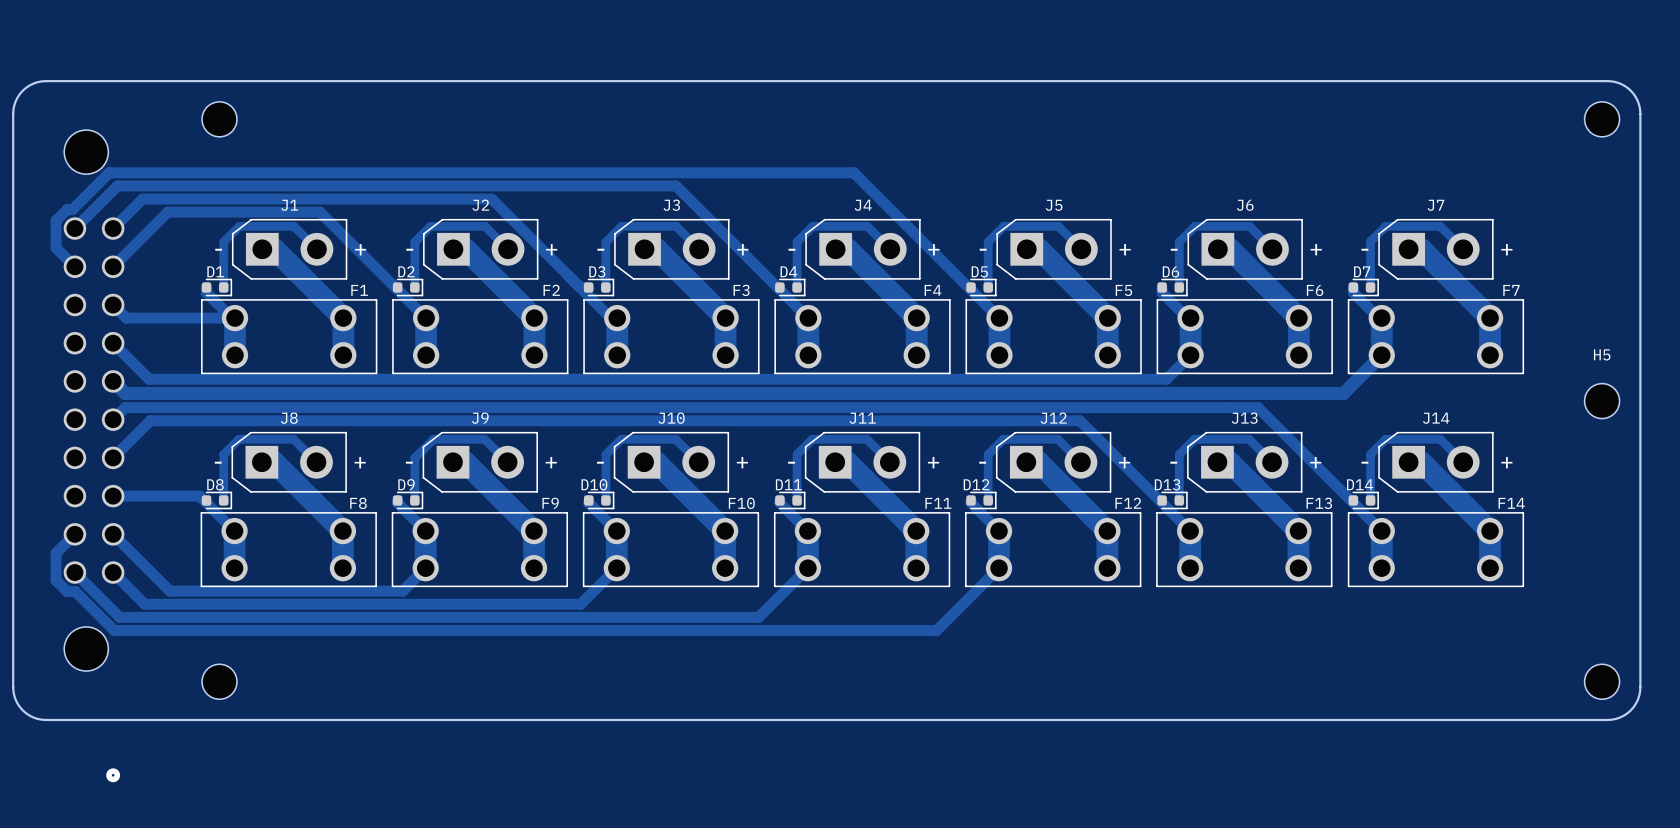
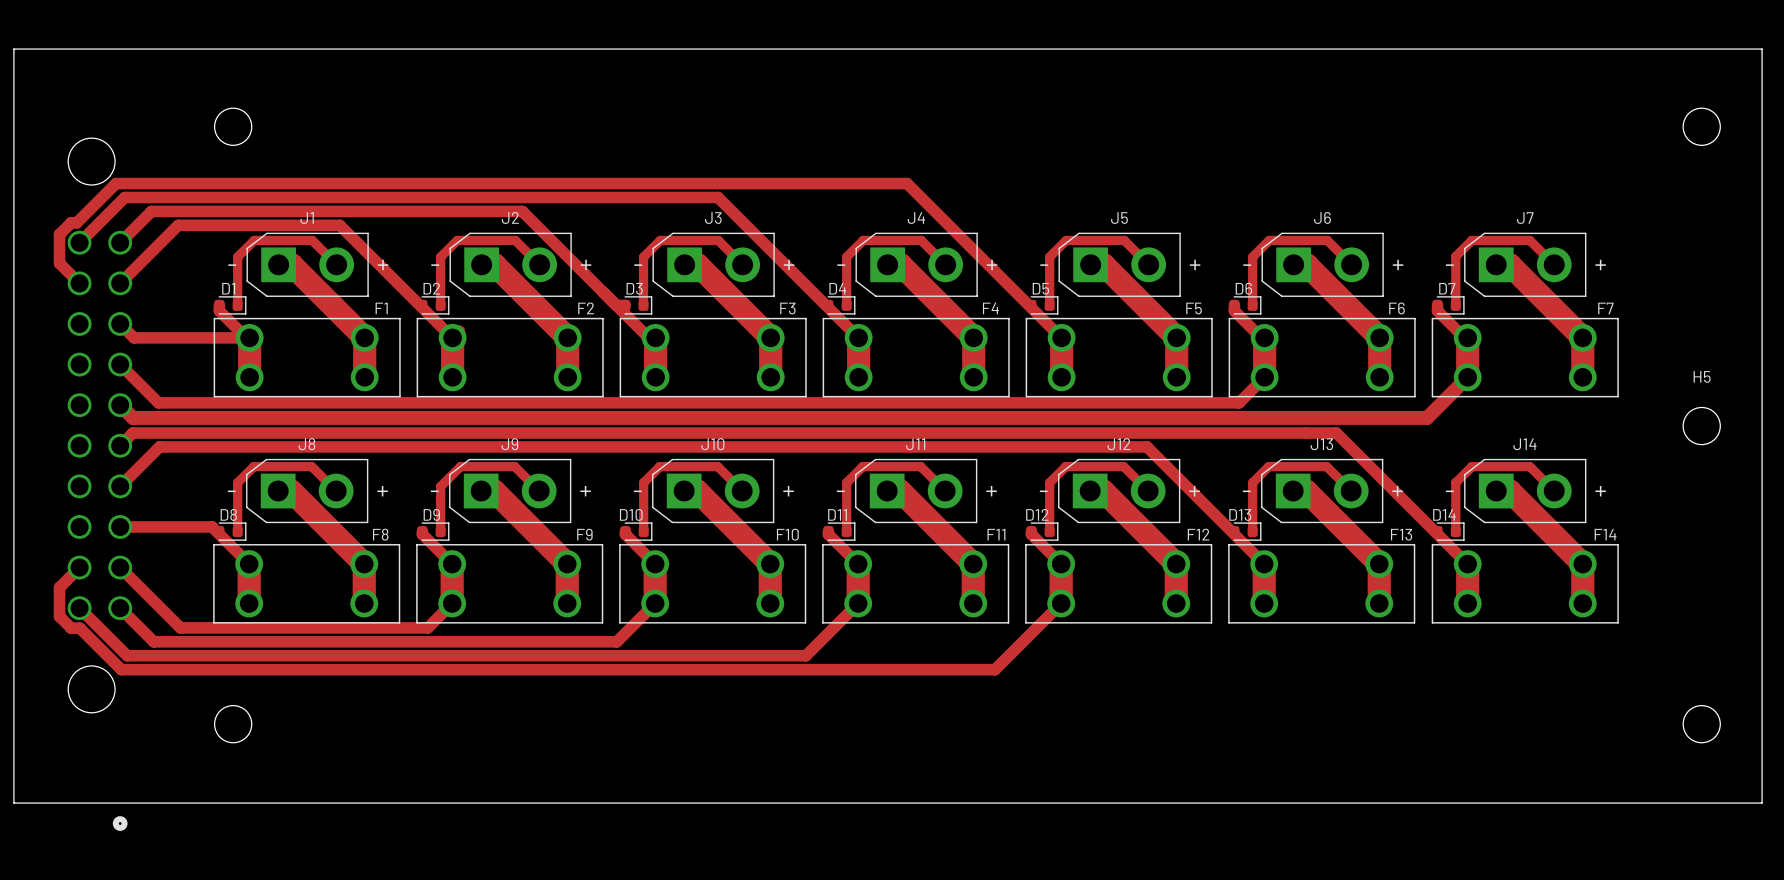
board edge: (45, 81) (1607, 81) (1618, 82) (1633, 93) (1638, 103) (1640, 113) (1640, 687) (1637, 699) (1627, 713) (1620, 717) (1607, 719) (45, 719) (33, 717) (26, 713) (17, 703) (13, 687) (13, 113) (15, 101) (22, 90) (33, 83) (45, 81) -> (13, 49) (13, 803) (1762, 803) (1762, 49) (13, 49)

